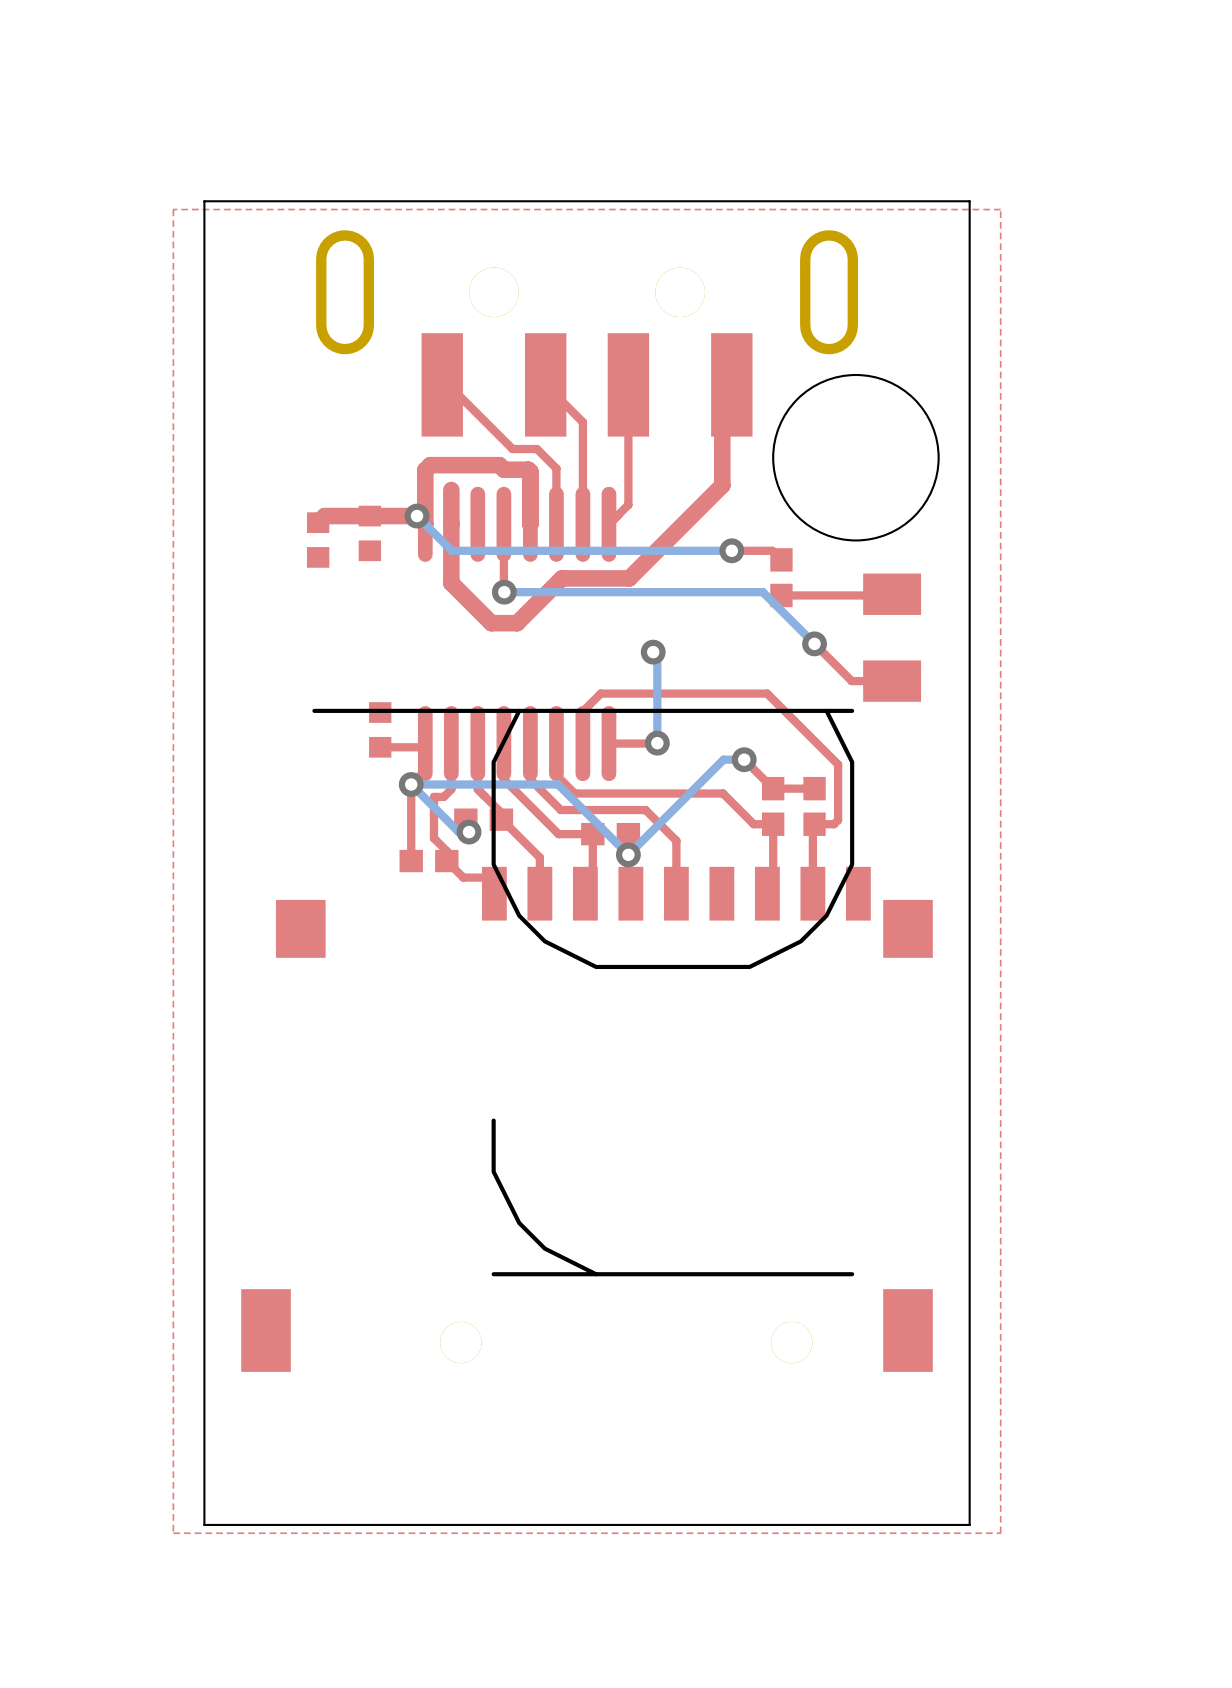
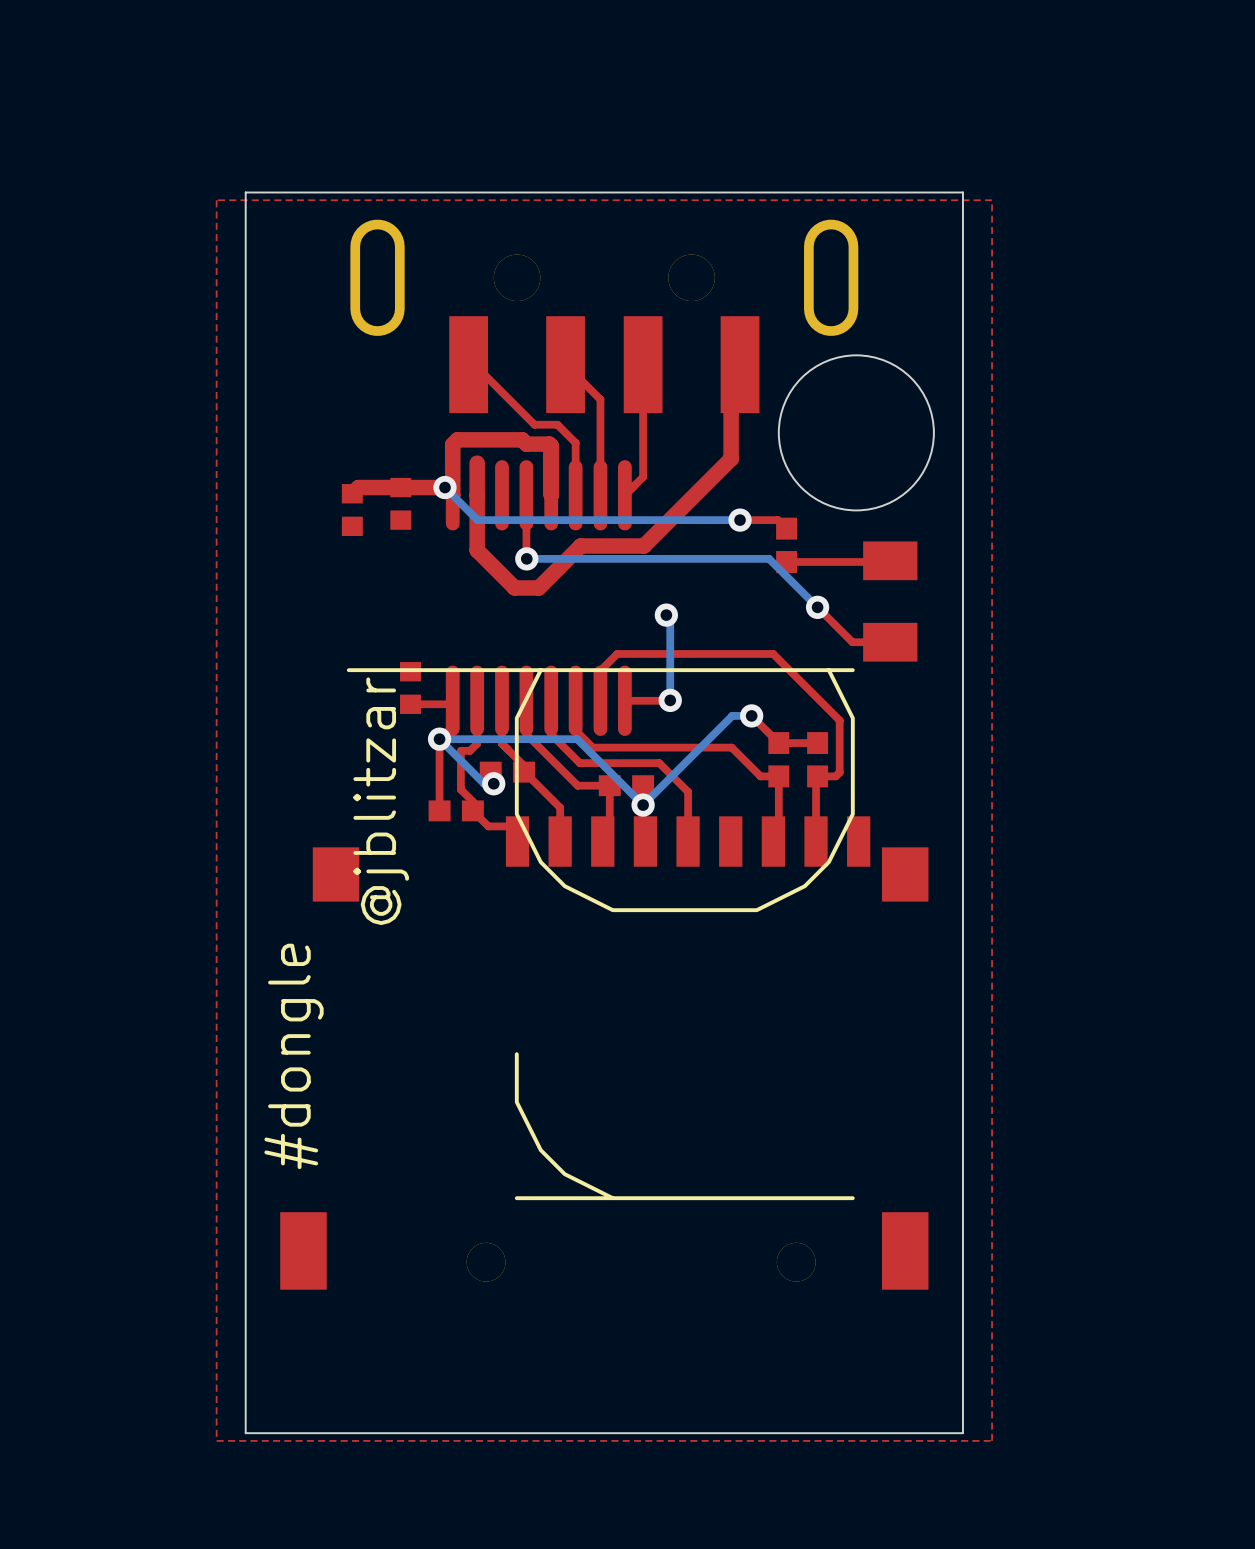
text: none -> @jblitzar (381, 801)
text: none -> #dongle (294, 1056)

